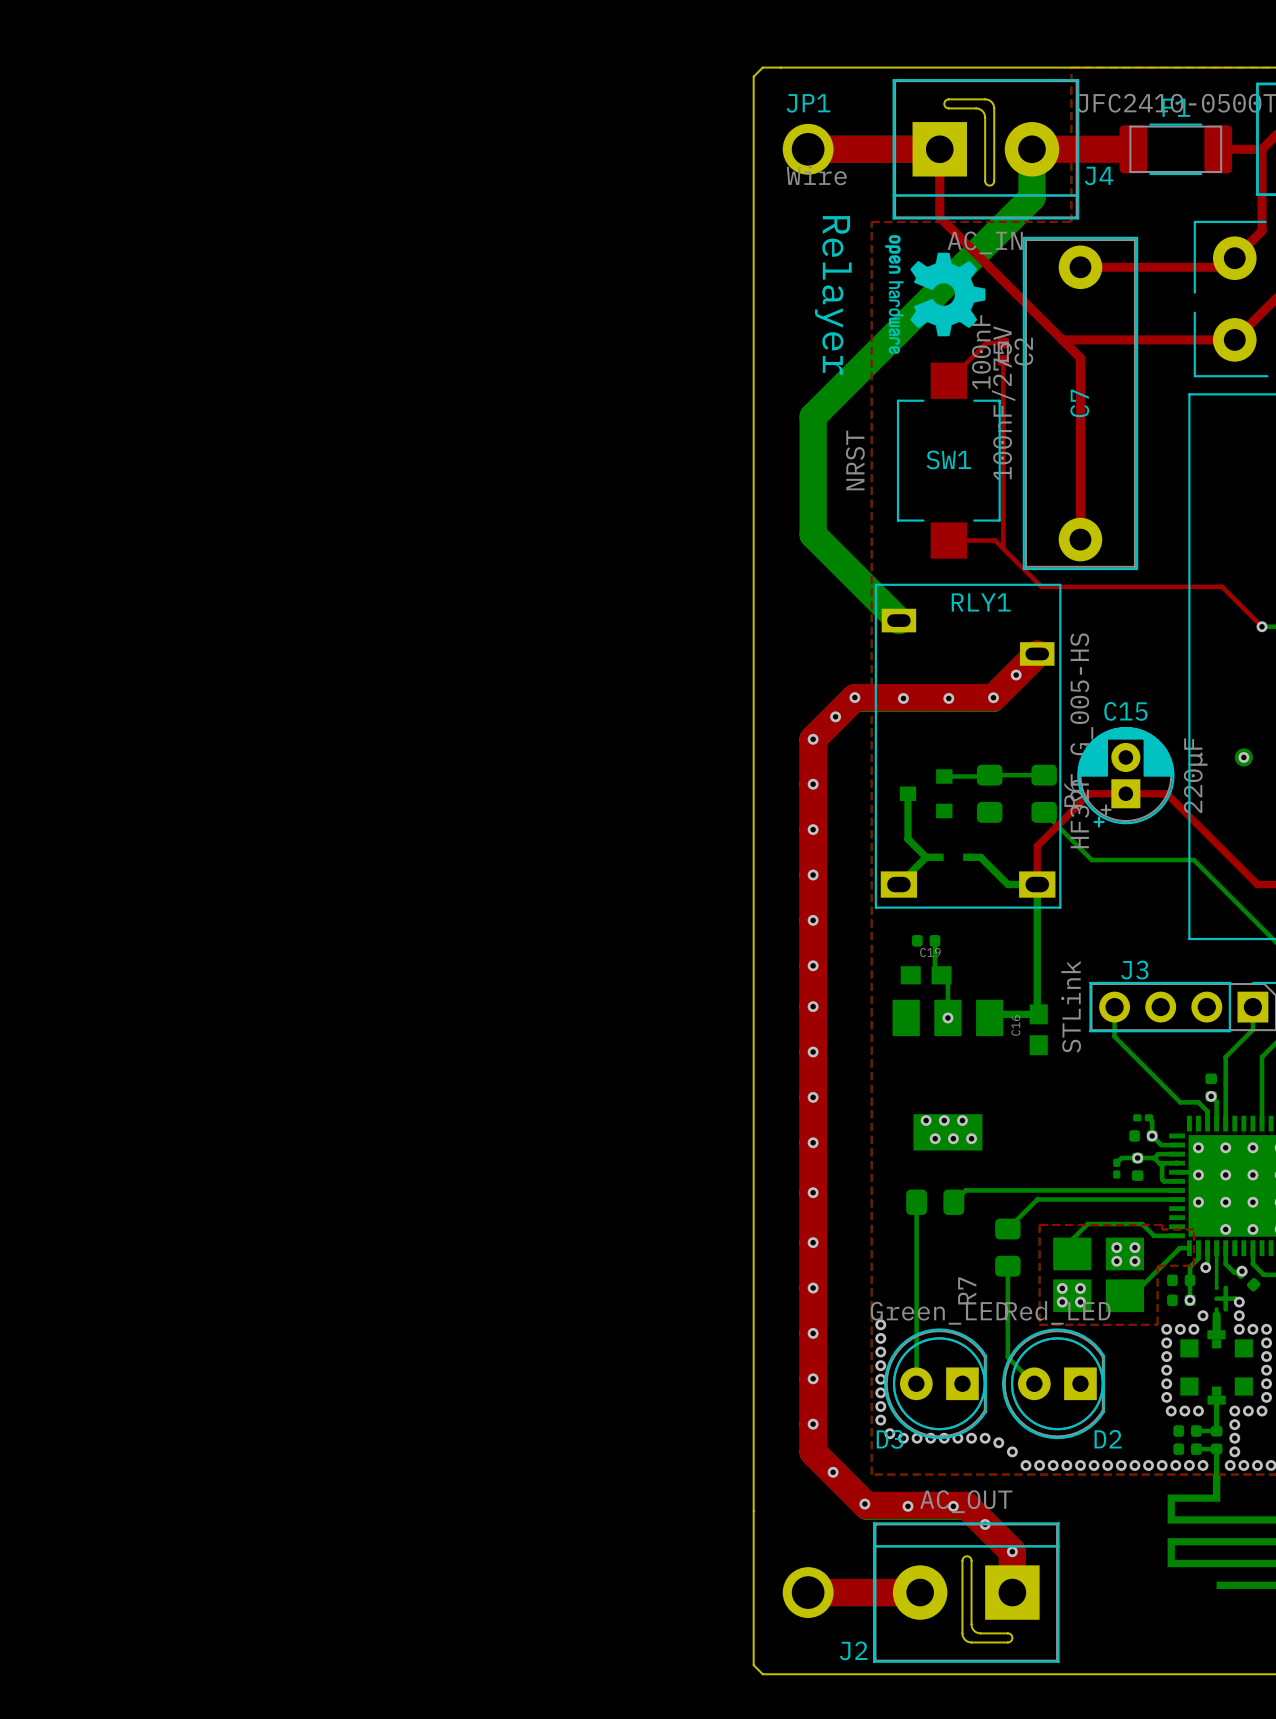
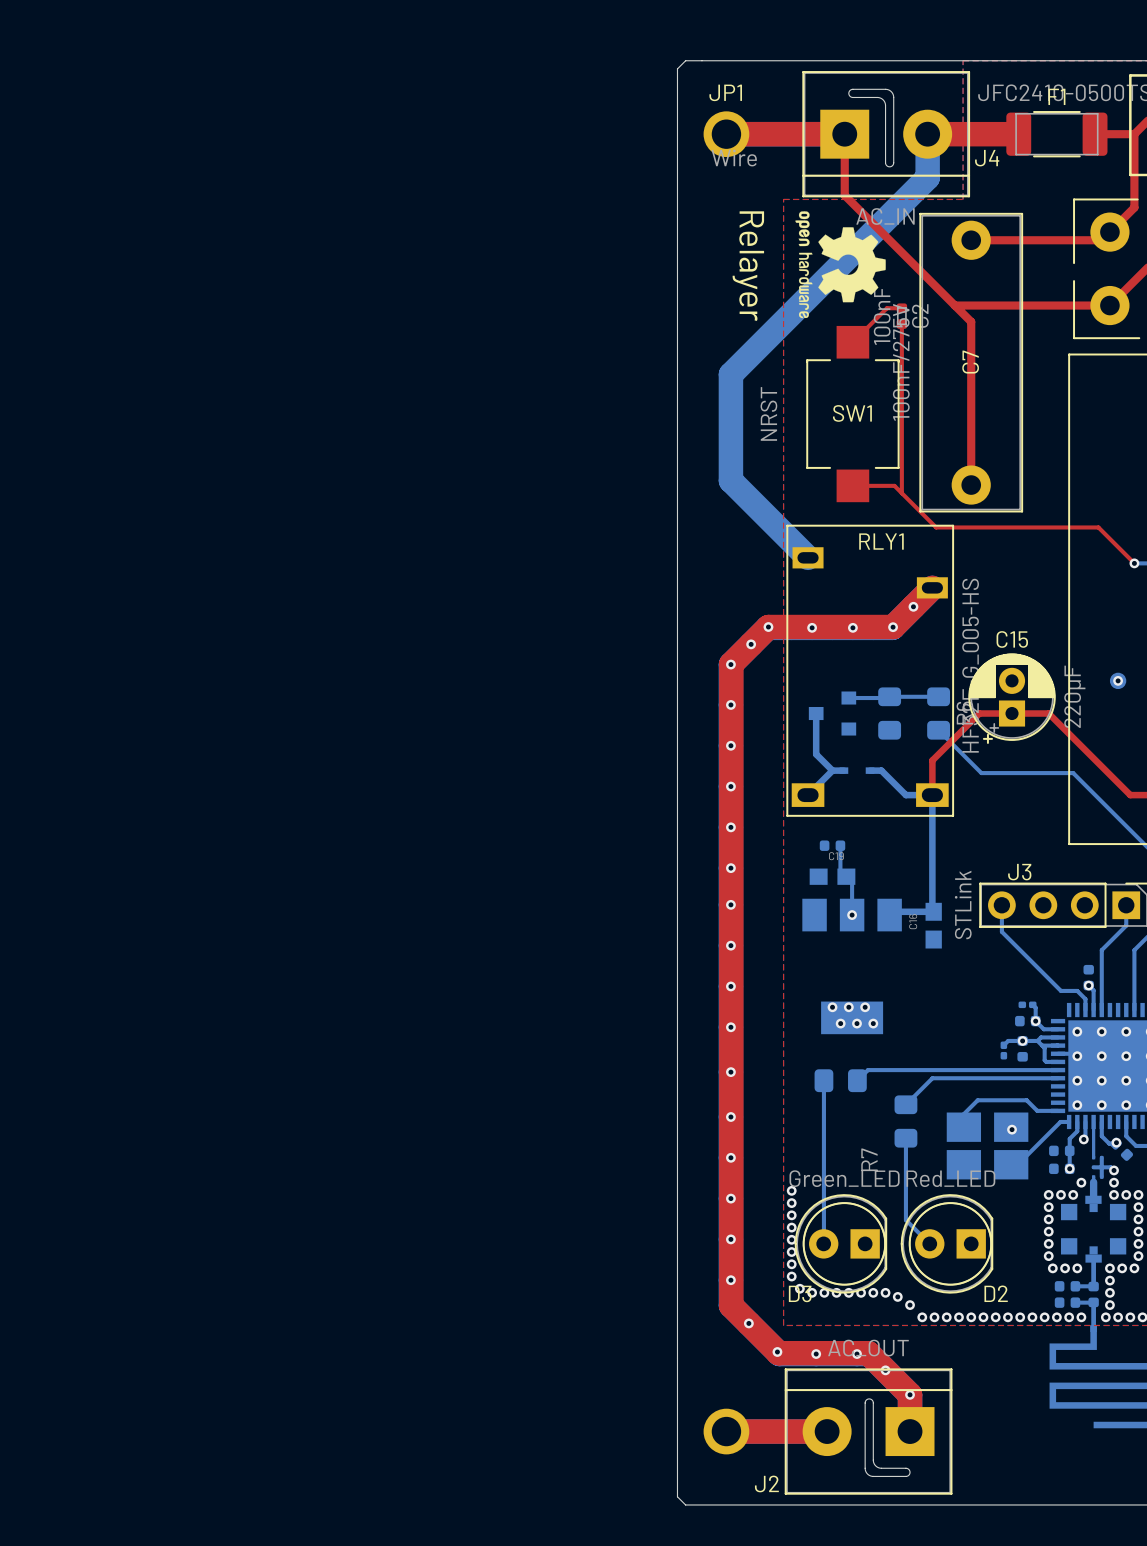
top zone outline: (1039, 1224) (1162, 1224) (1162, 1229) (1193, 1229) (1193, 1265) (1157, 1265) (1157, 1324) (1039, 1324) (1039, 1224) -> none
via: none -> (1077, 1105)
via: (1116, 1247) -> none
via: (1134, 1247) -> none
via: none -> (1012, 1129)
via: (1116, 1261) -> none
via: (1134, 1261) -> none
via: (1062, 1288) -> none
via: (1080, 1288) -> none
via: (1062, 1302) -> none
via: (1080, 1302) -> none

